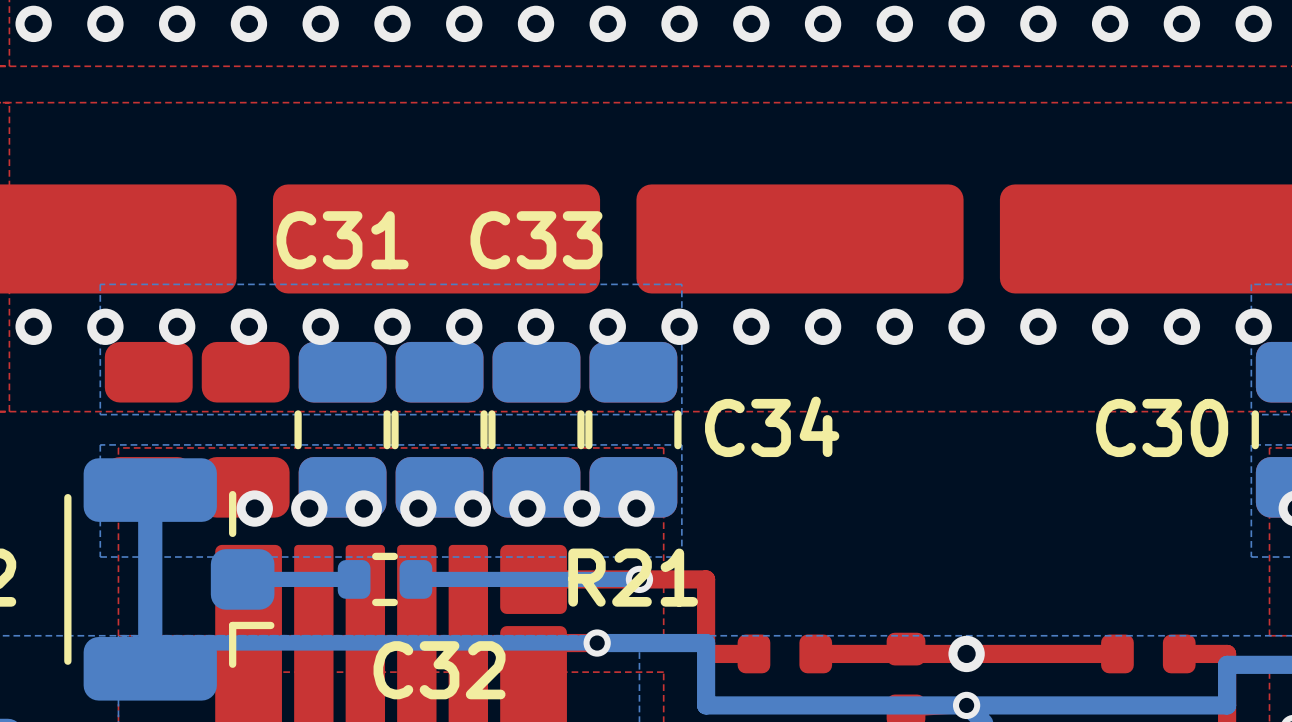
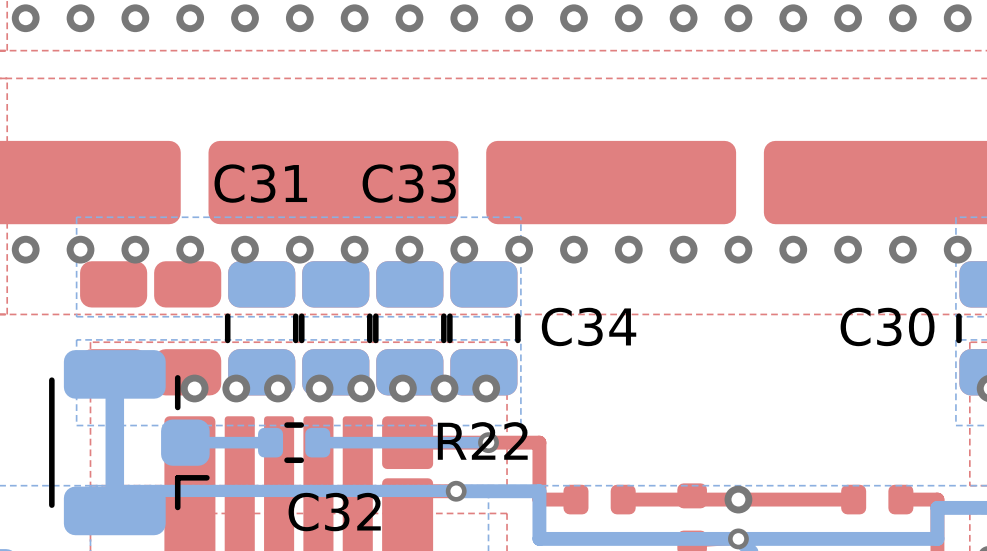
text: R21 (633, 577) -> R22 (482, 440)

